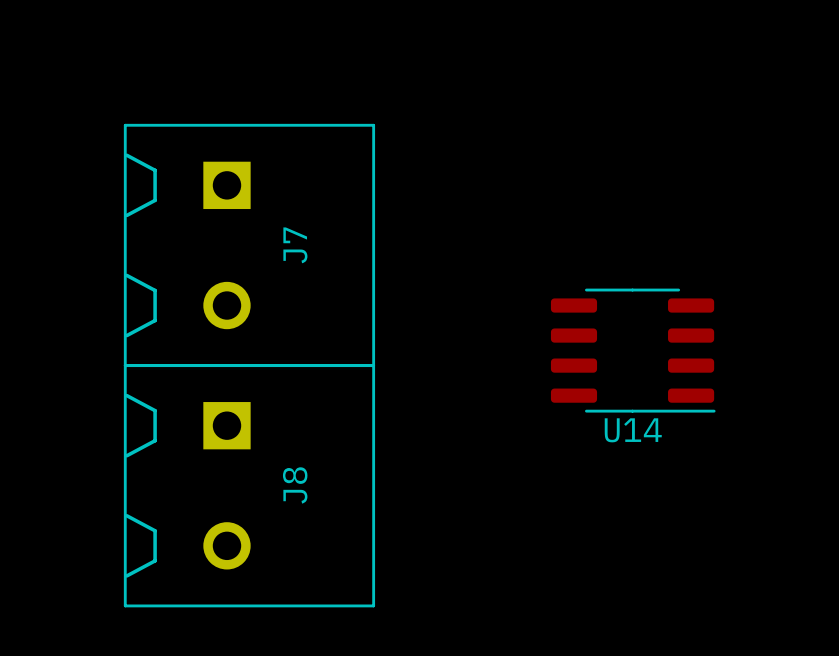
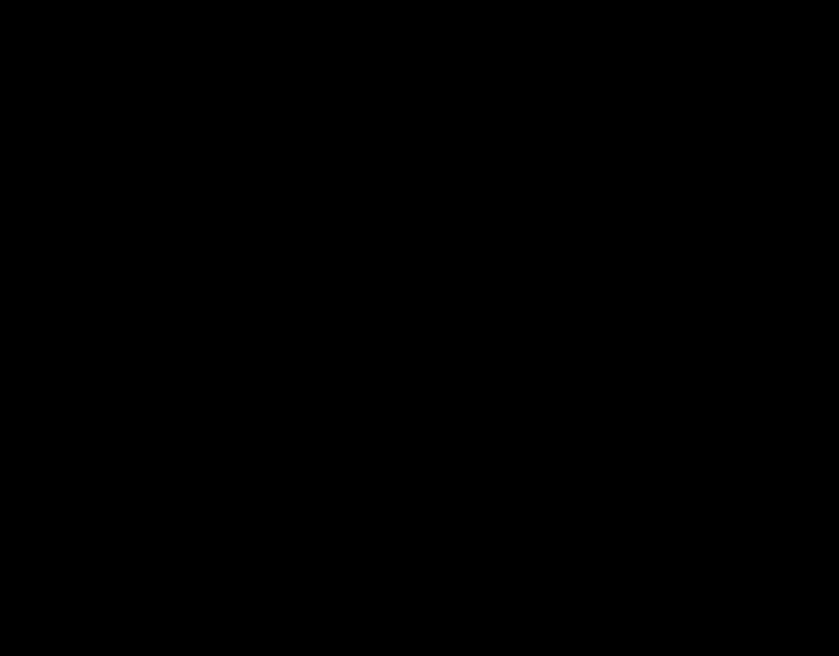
J7: (249, 245) -> none
U14: (633, 350) -> none
J8: (249, 485) -> none

